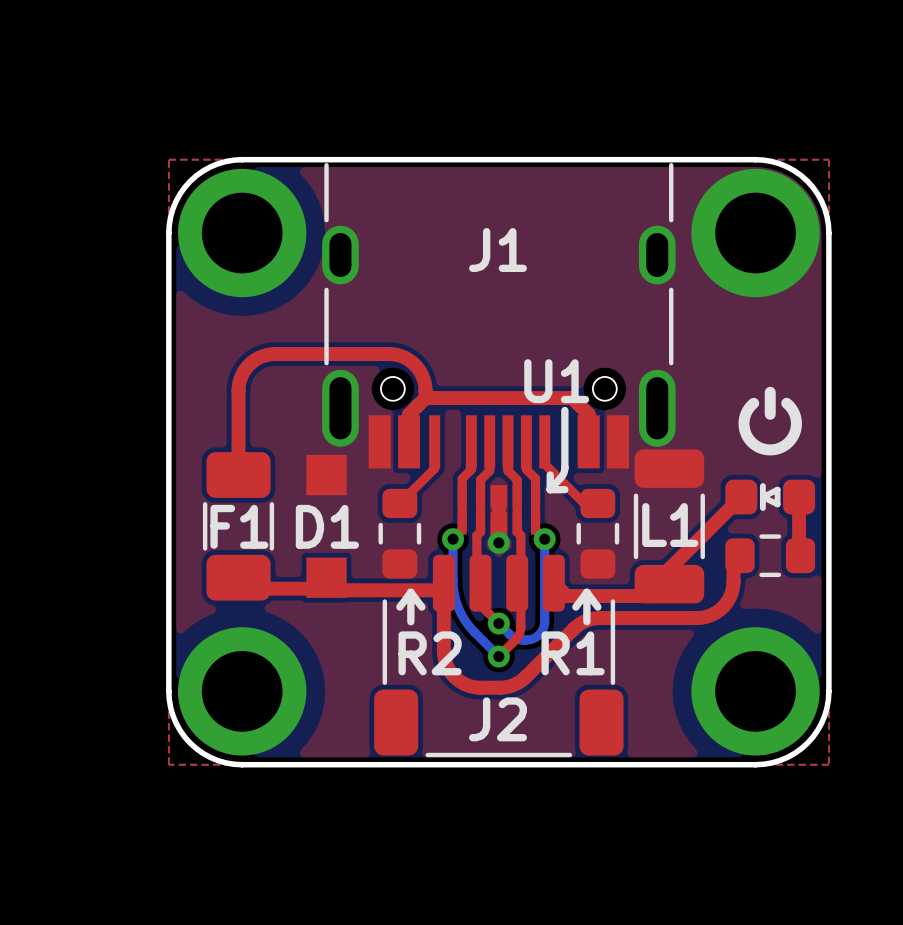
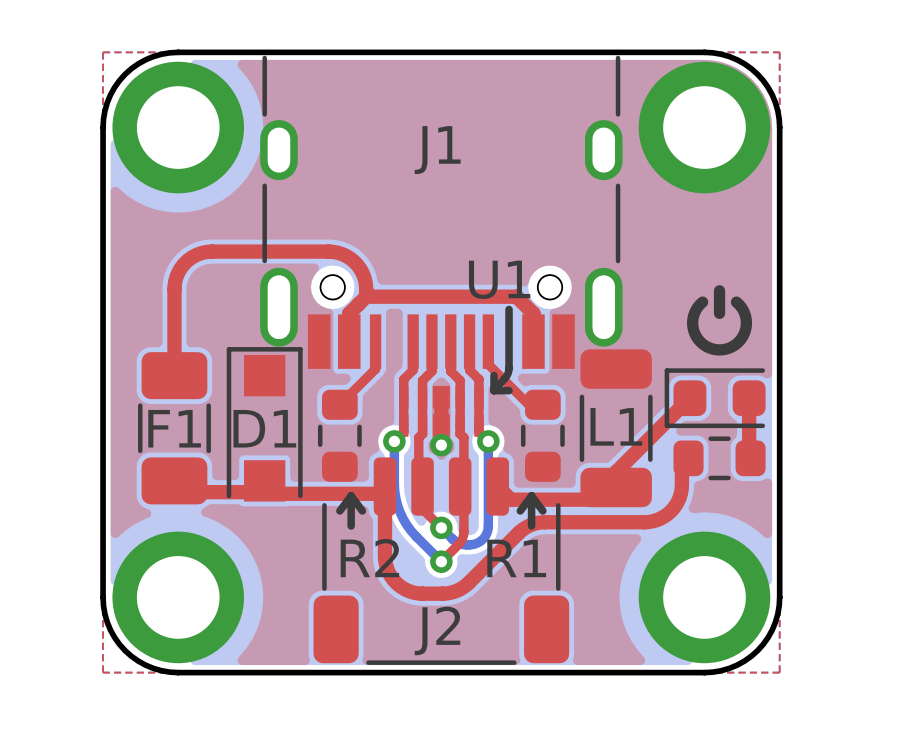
D1 footprint: [306, 454, 347, 598] -> [226, 347, 303, 502]
part footprint: [725, 479, 816, 515] -> [664, 368, 766, 429]
line: (762, 486) (762, 508) -> none
line: (777, 489) (762, 497) (777, 504) (777, 489) -> none

